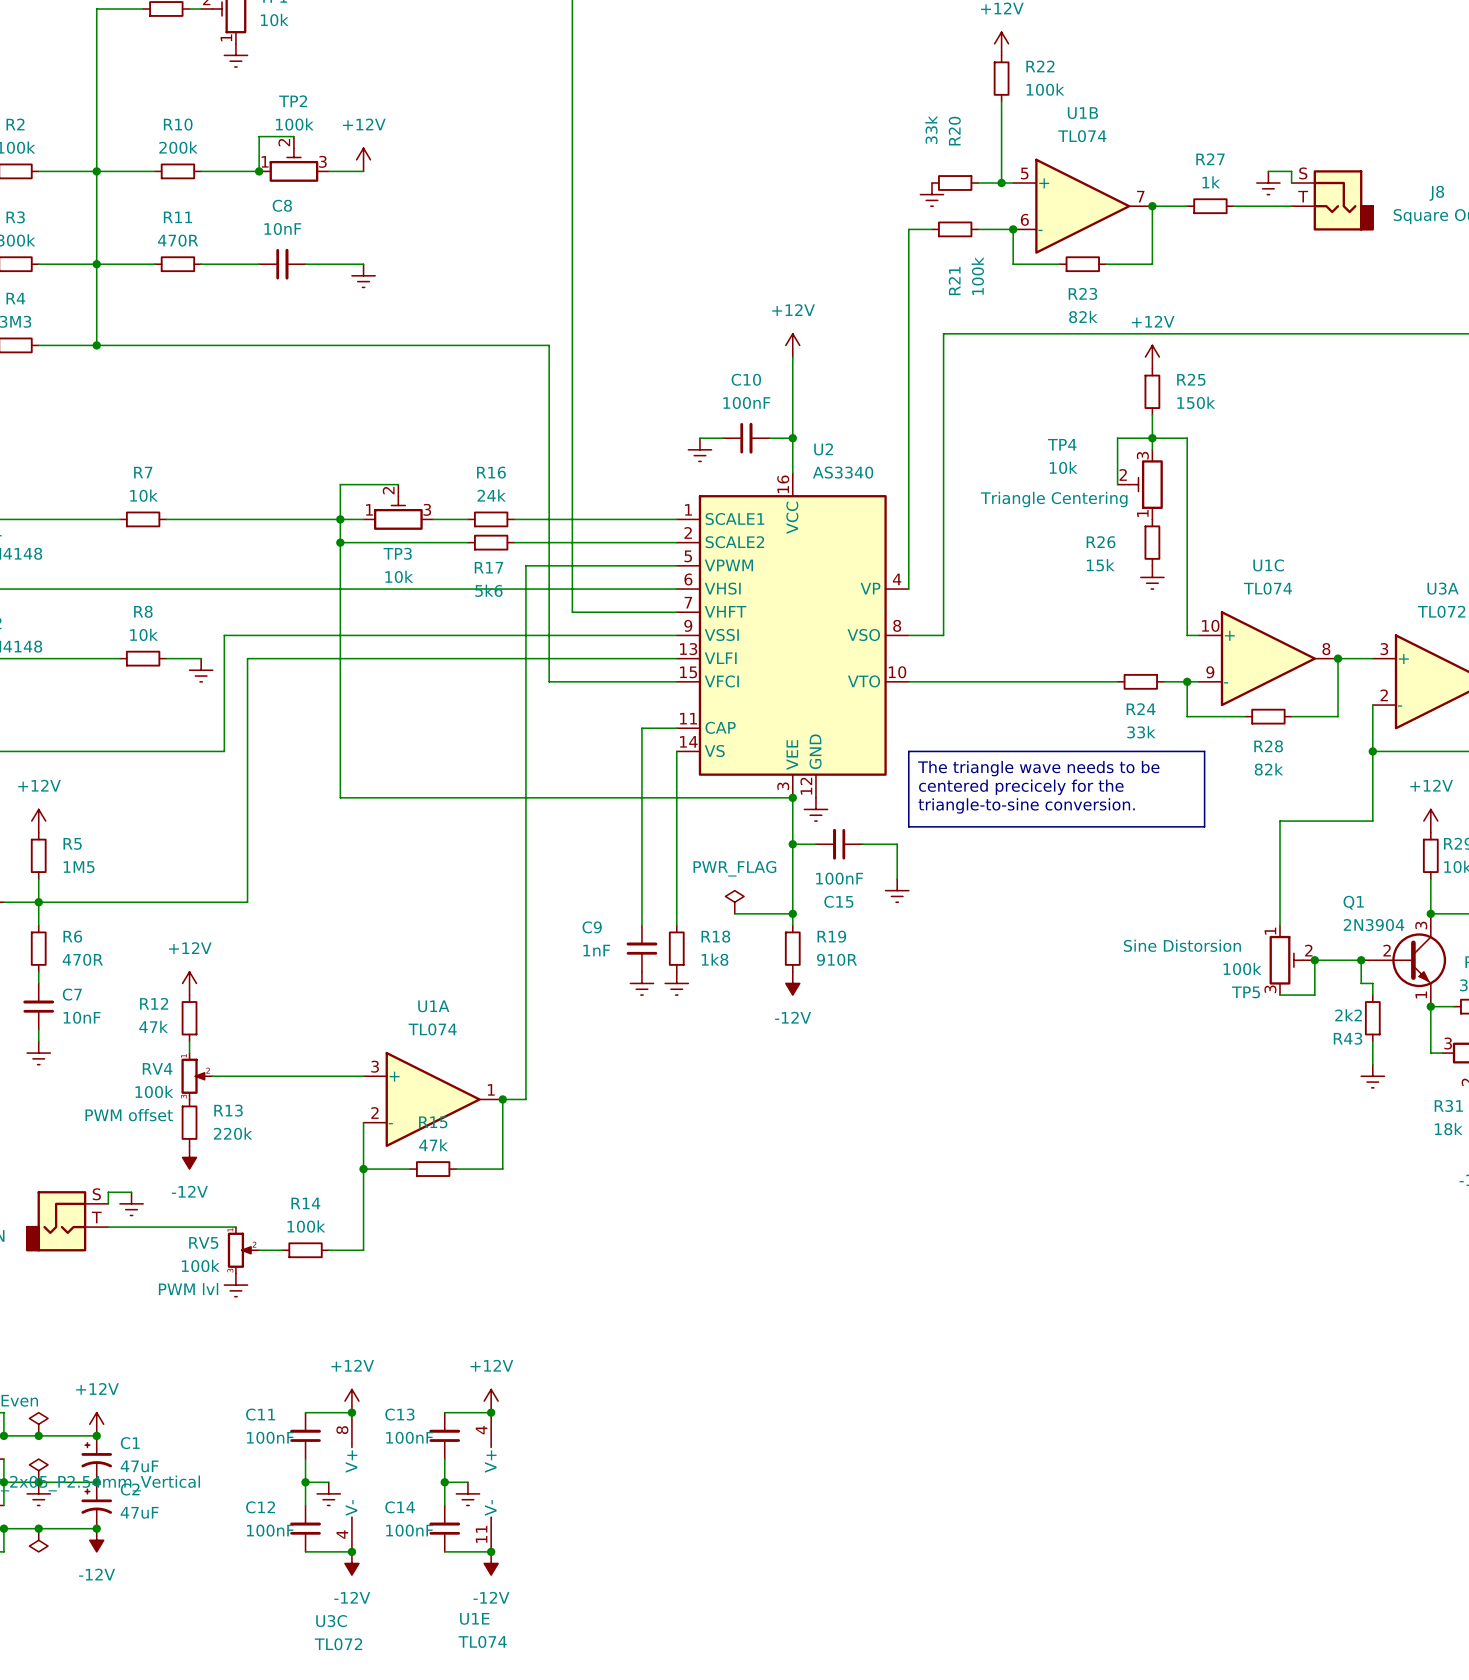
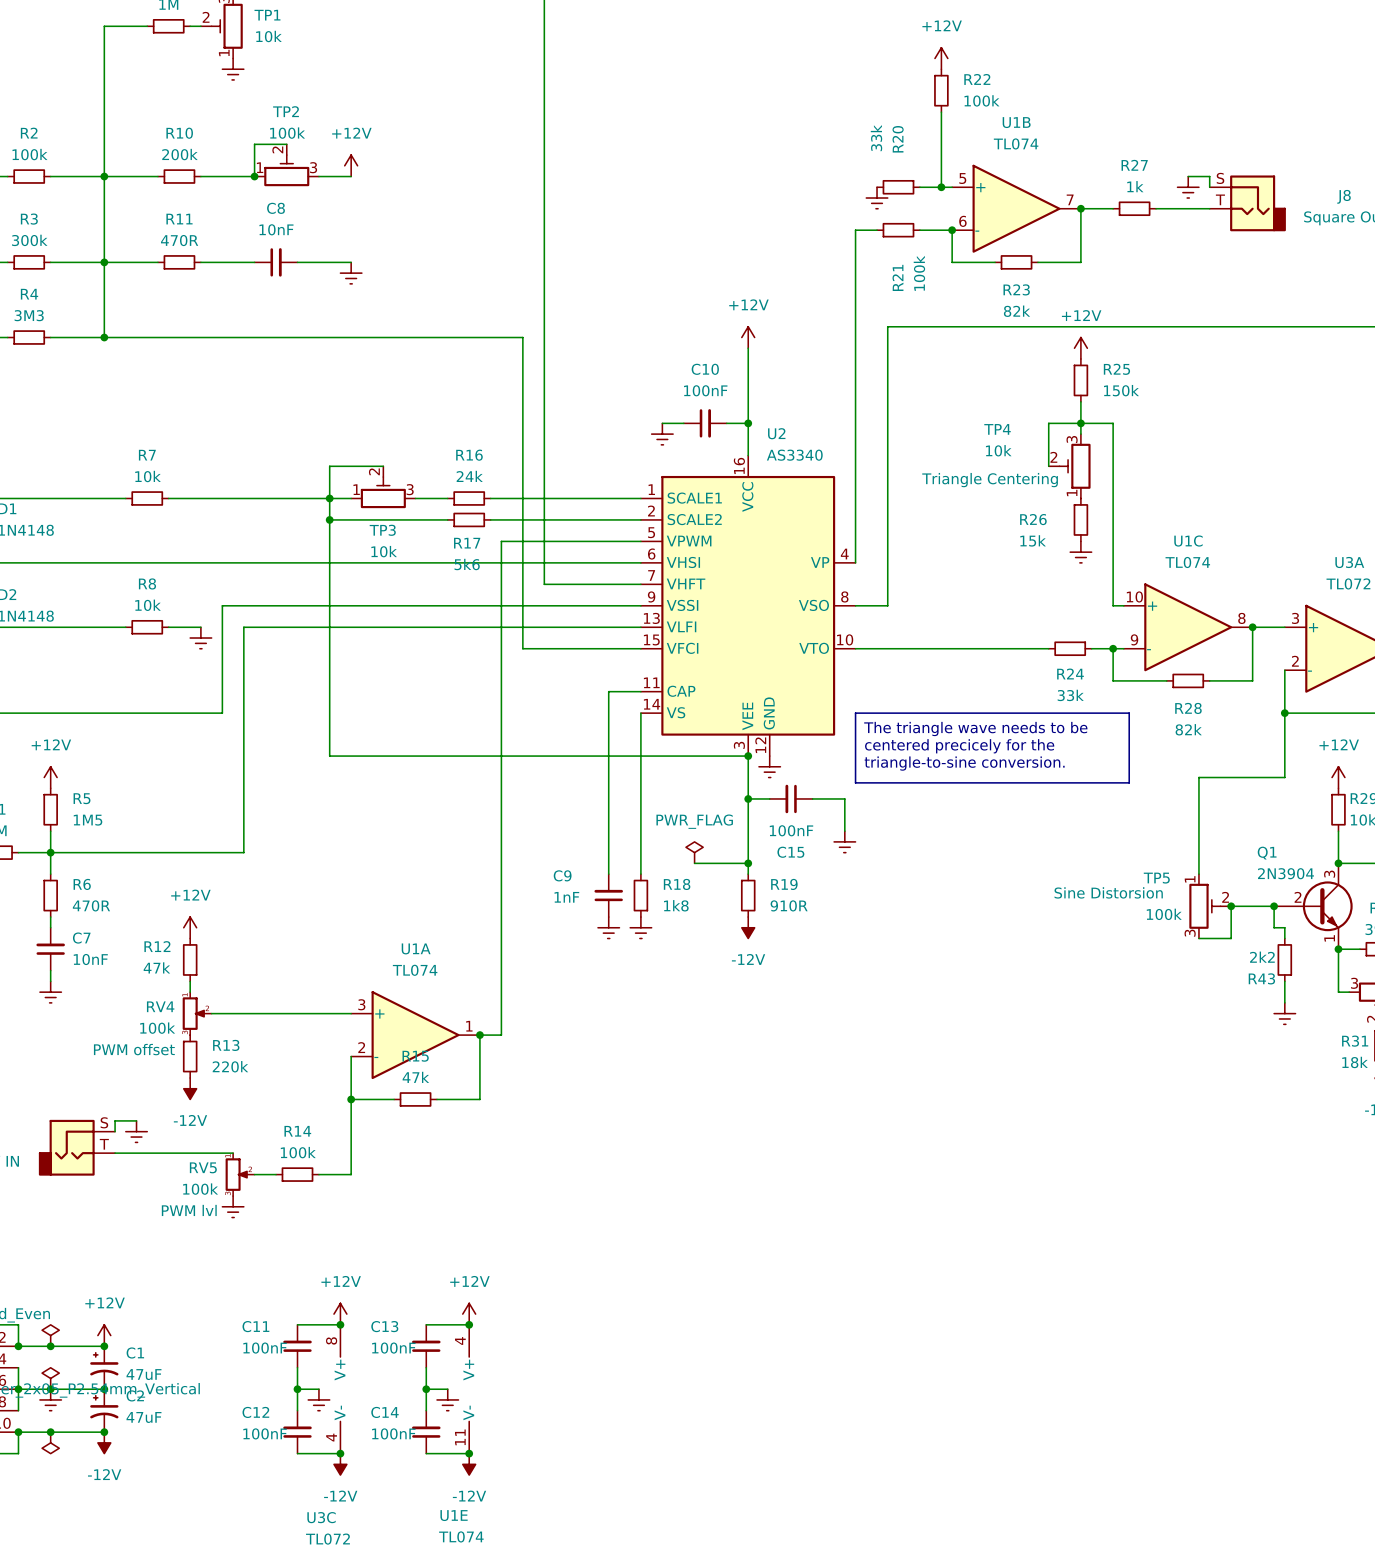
TP5 name position: TP5 (1246, 992) -> TP5 (1156, 878)

